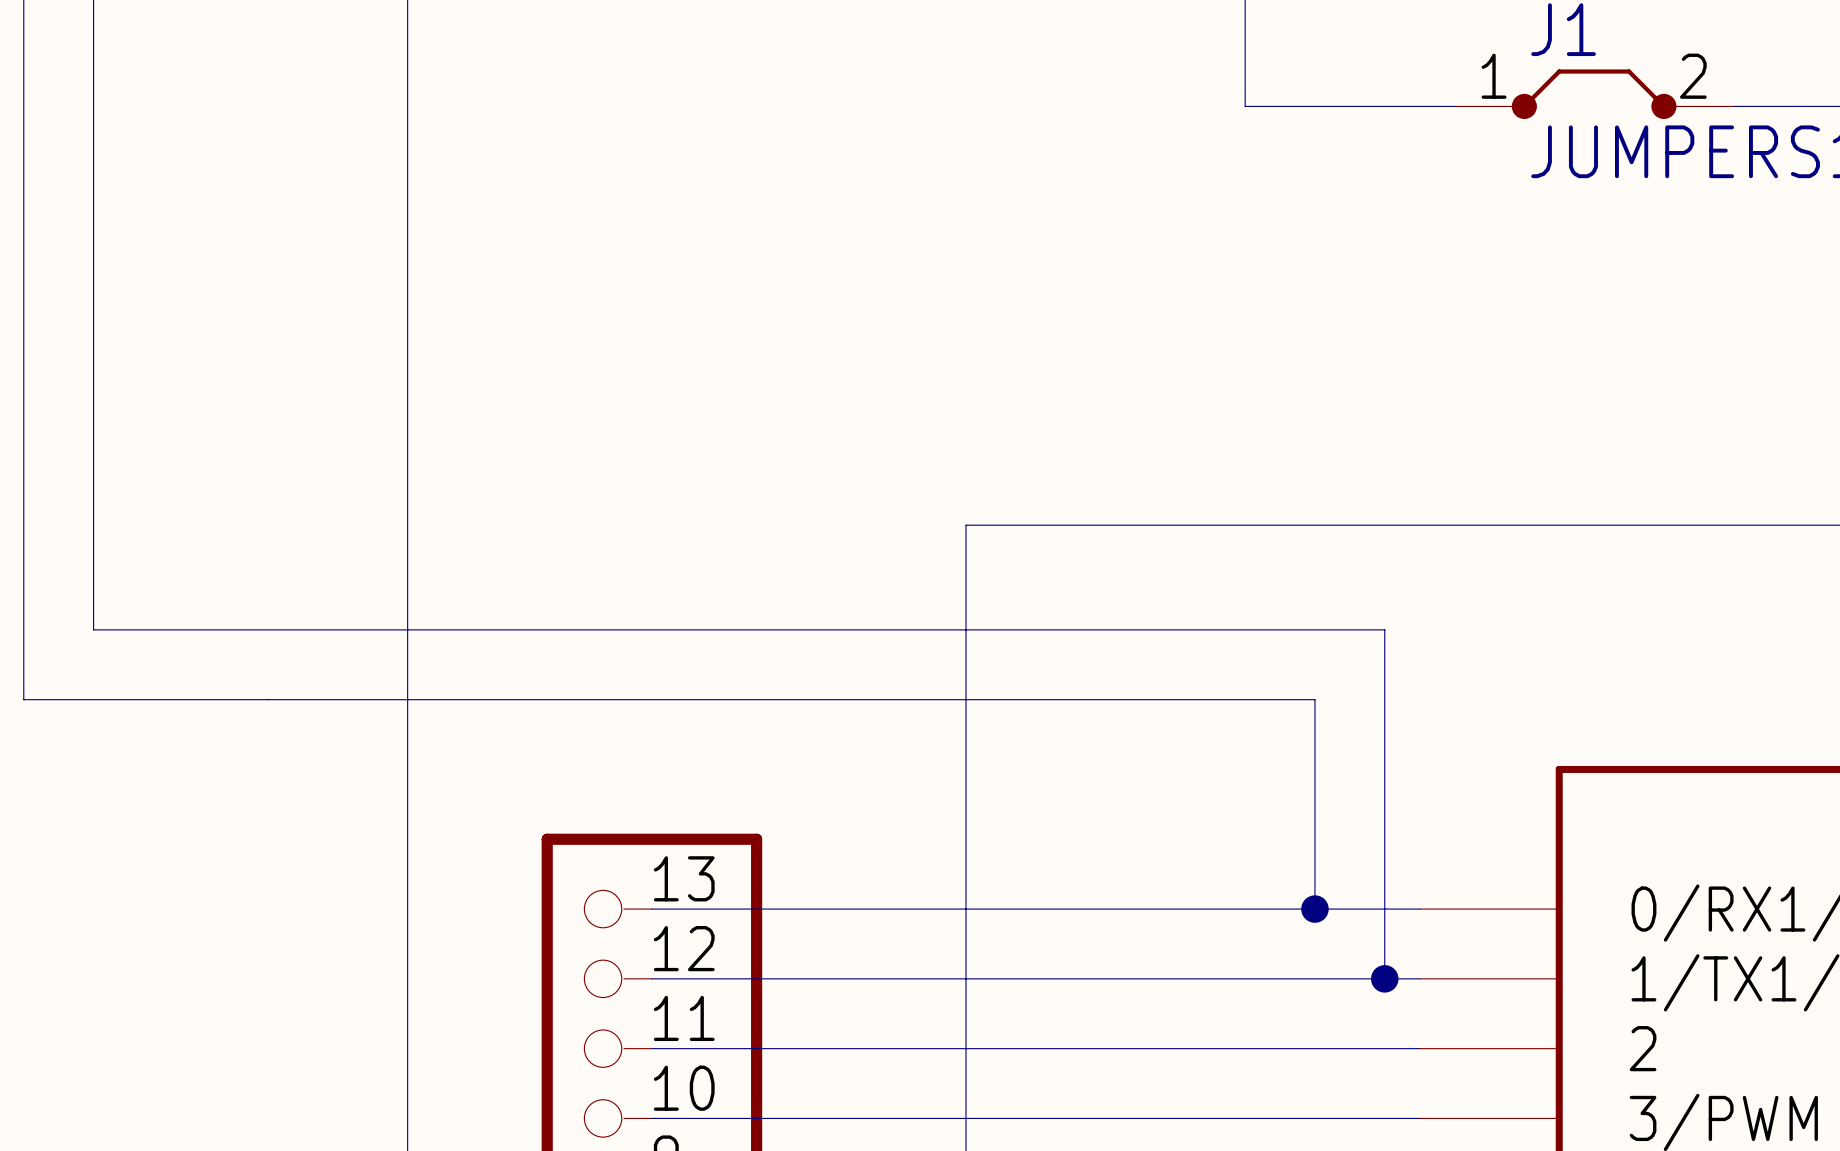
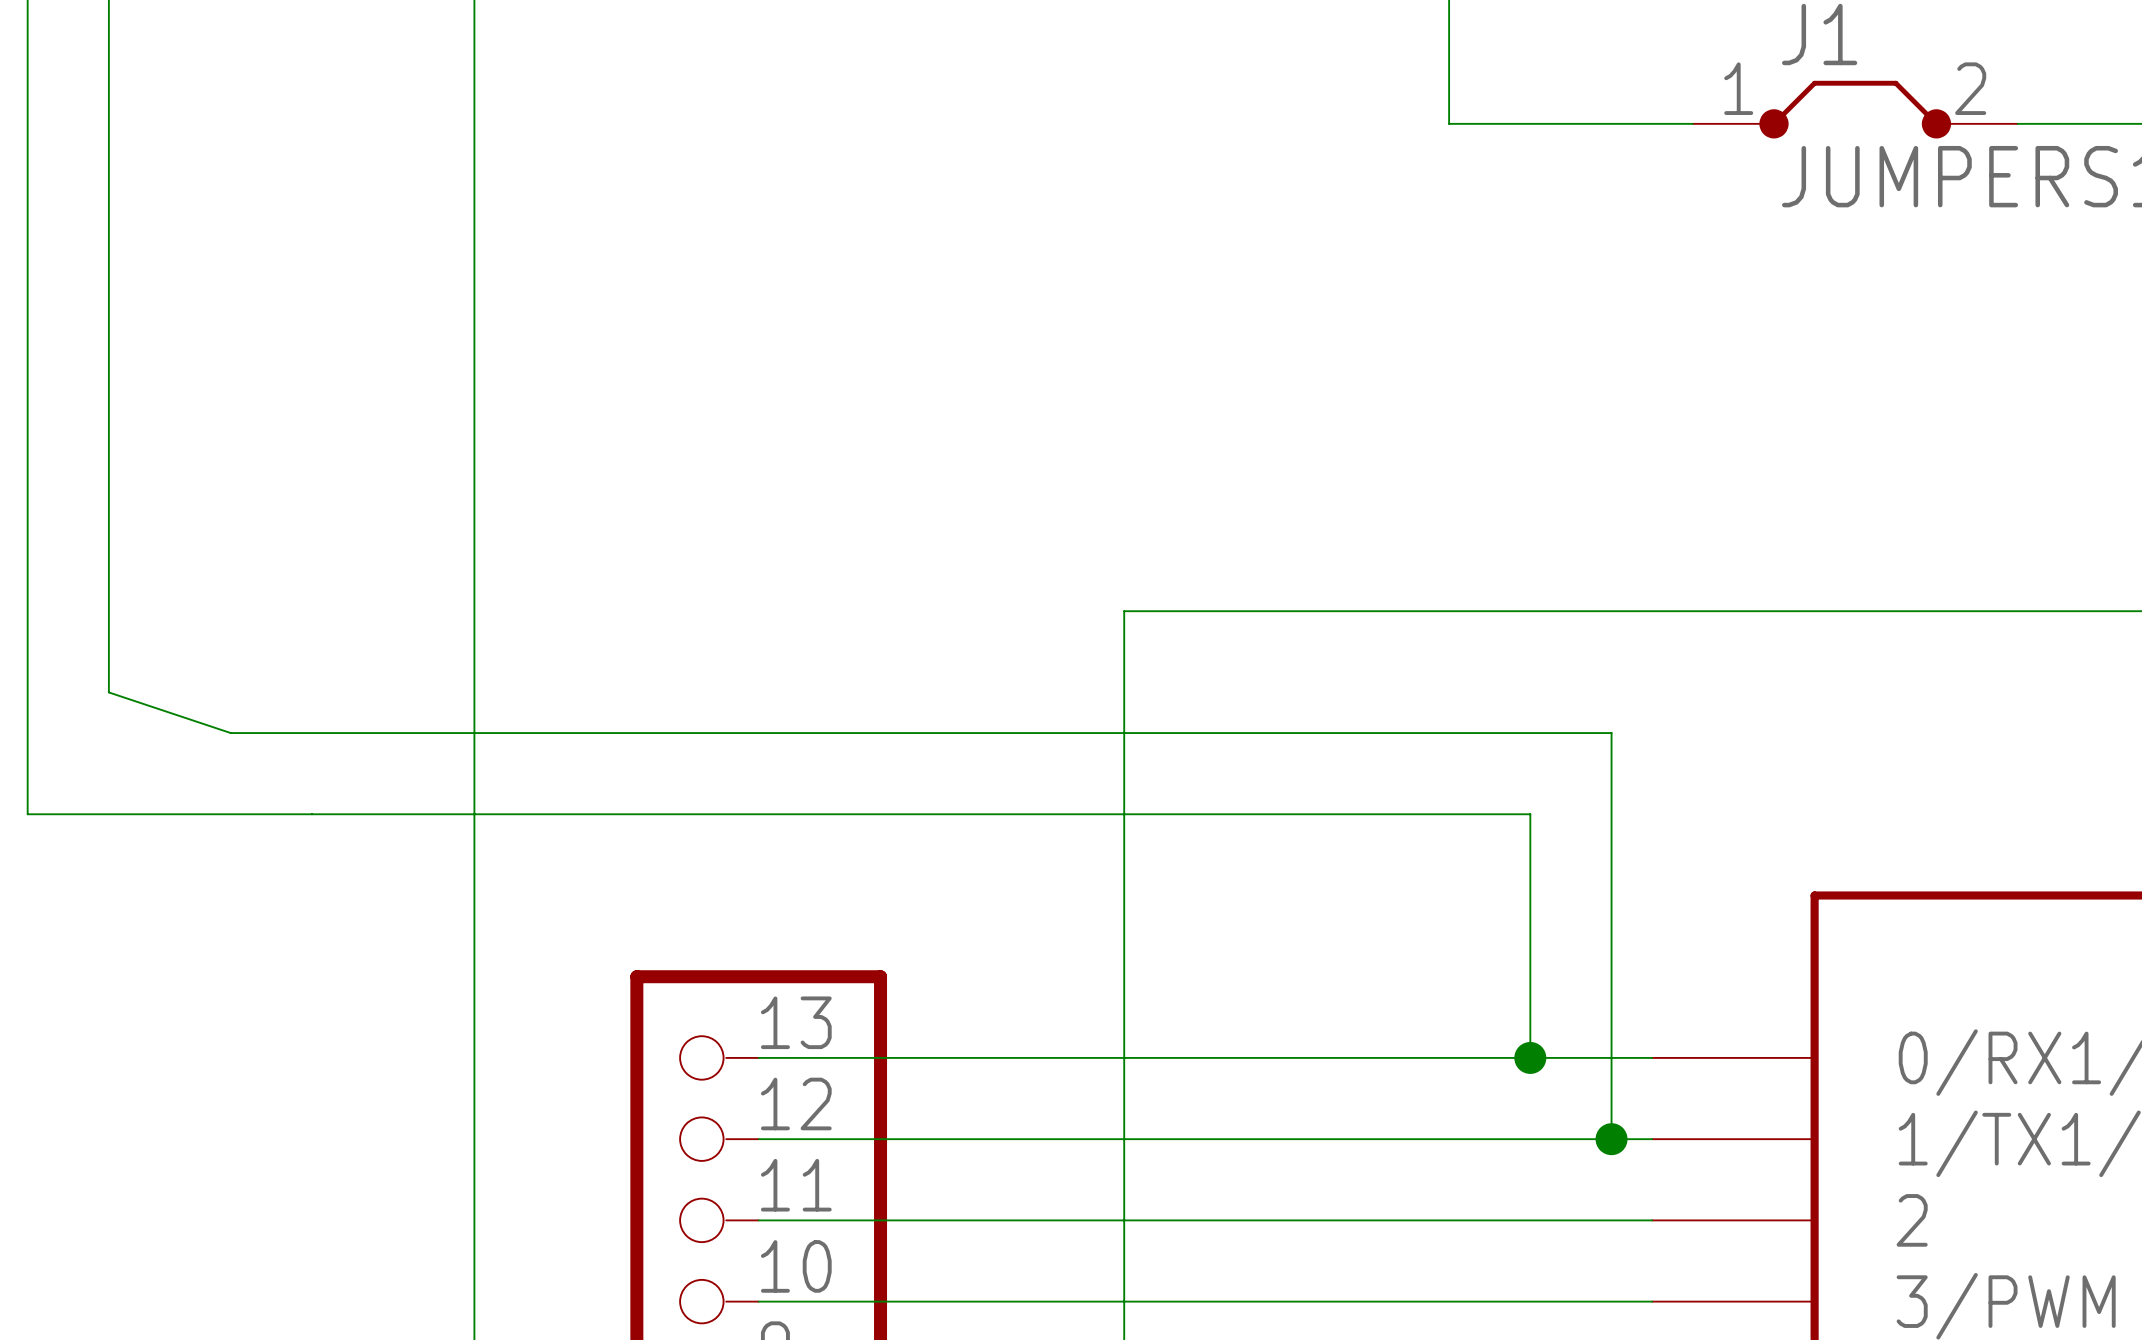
wire: (93, 594) (93, 629) (198, 629) -> (108, 692) (230, 733)

